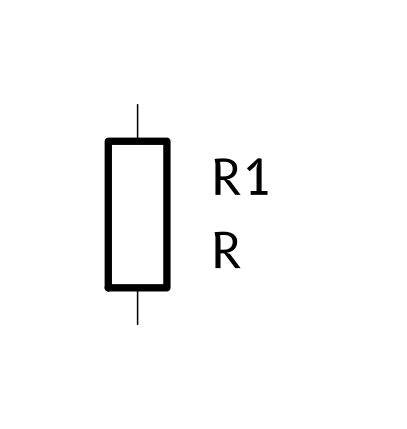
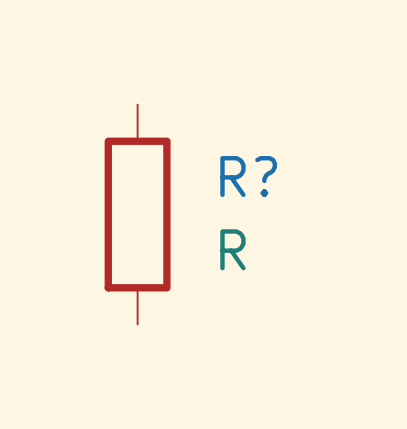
R1 name: R1 (241, 176) -> R? (248, 176)

